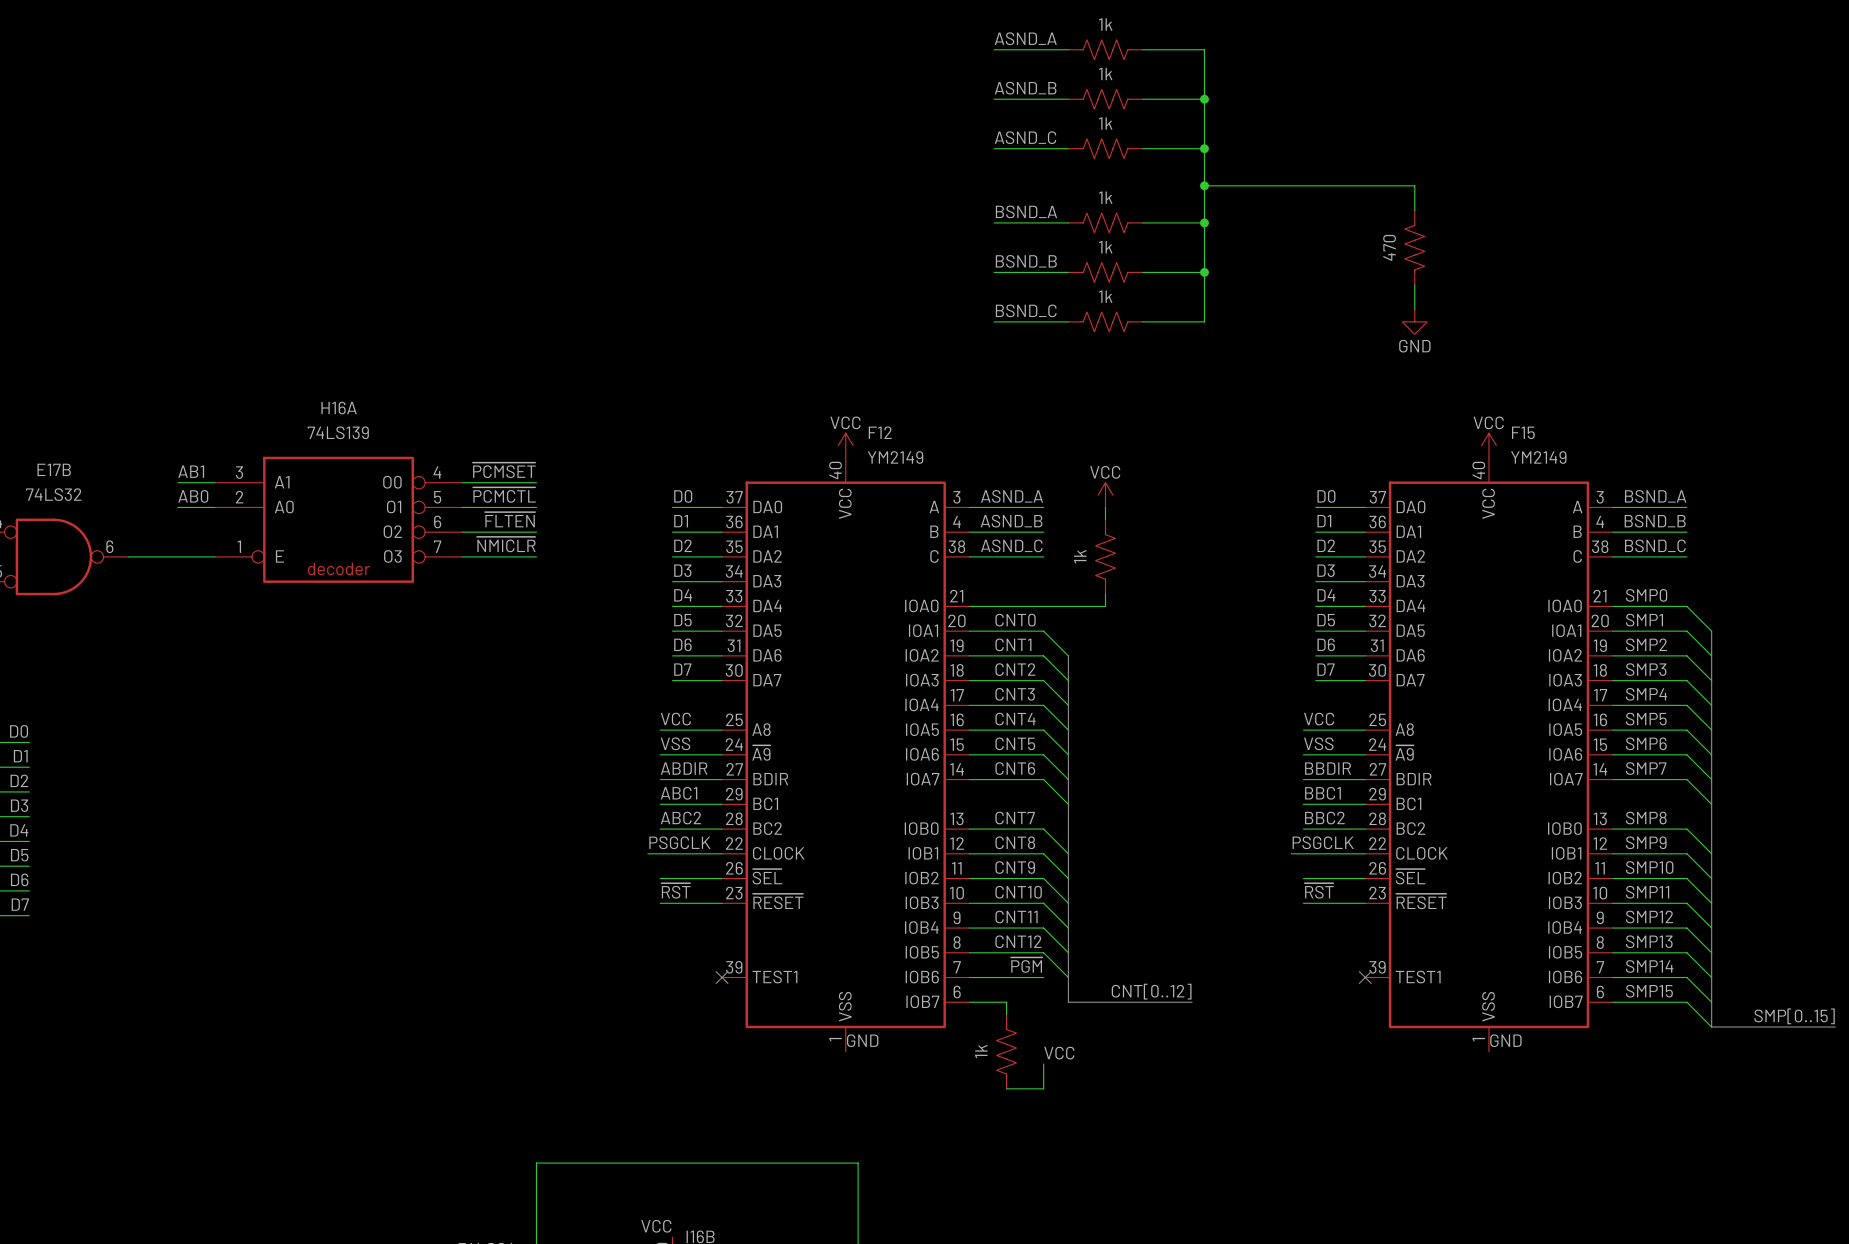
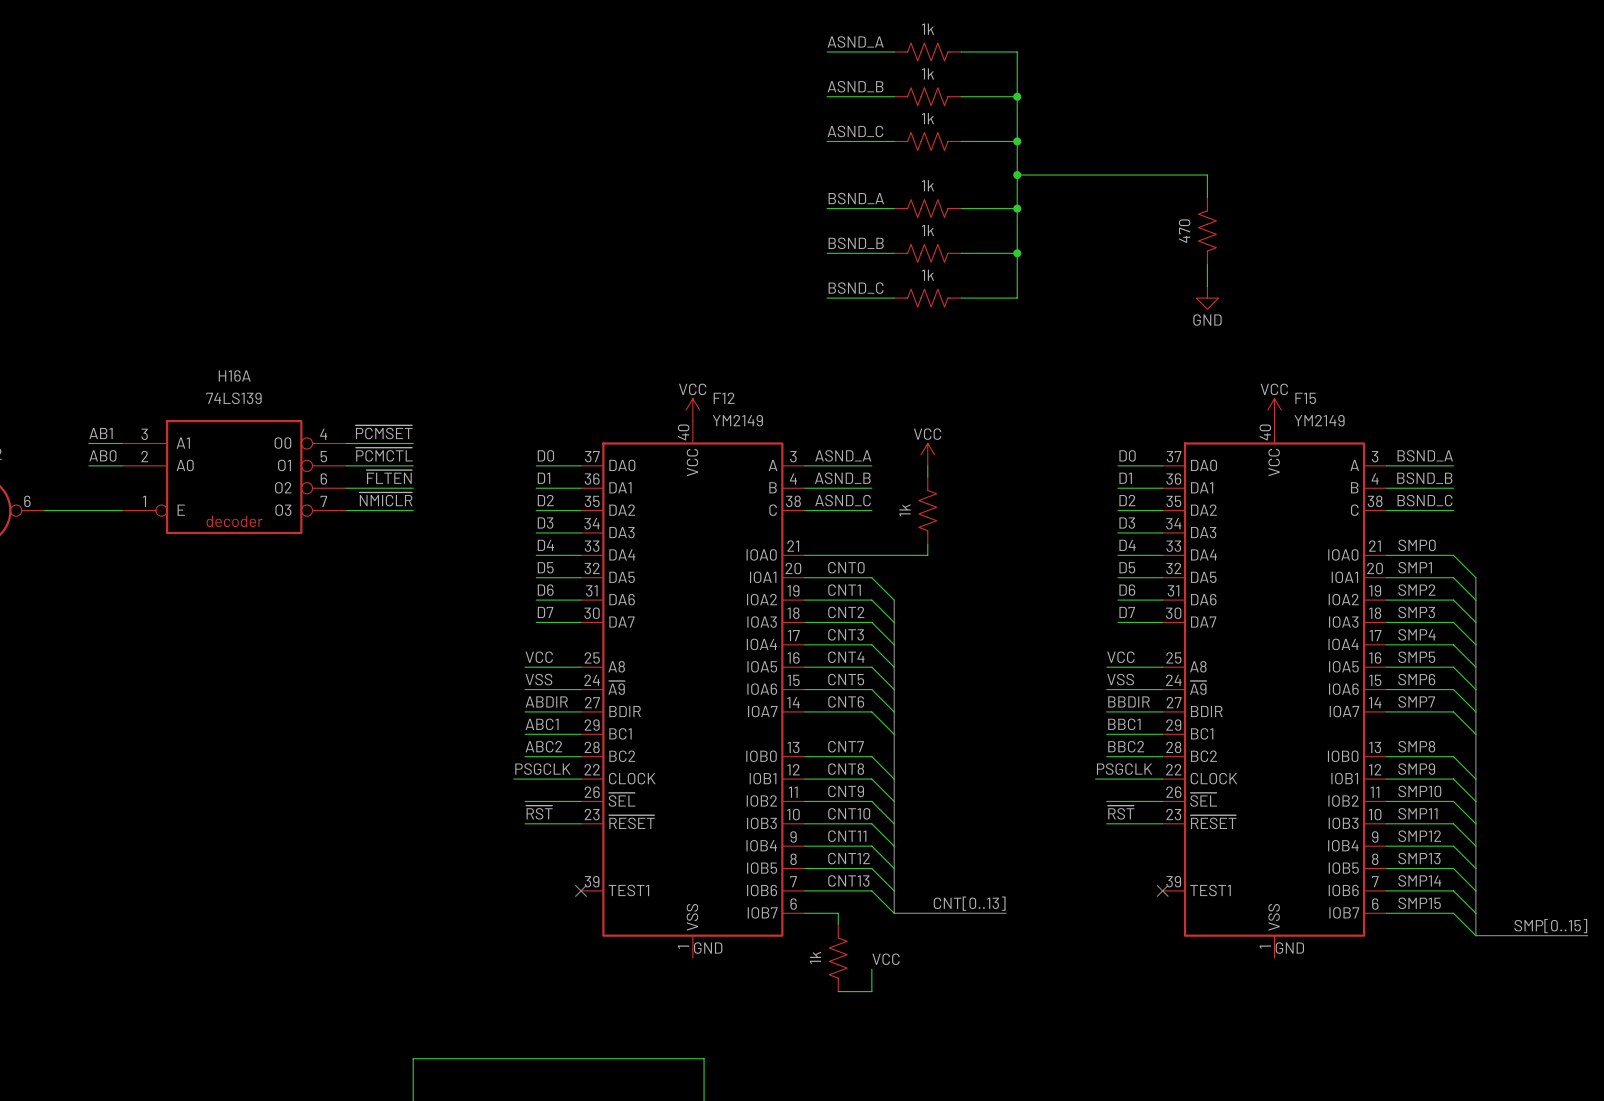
label: ~{PGM} (1026, 965) -> none
label: none -> CNT13 (848, 880)
wire: none -> (871, 890) (894, 913)
label: CNT[0..12] (1151, 991) -> CNT[0..13] (969, 903)

